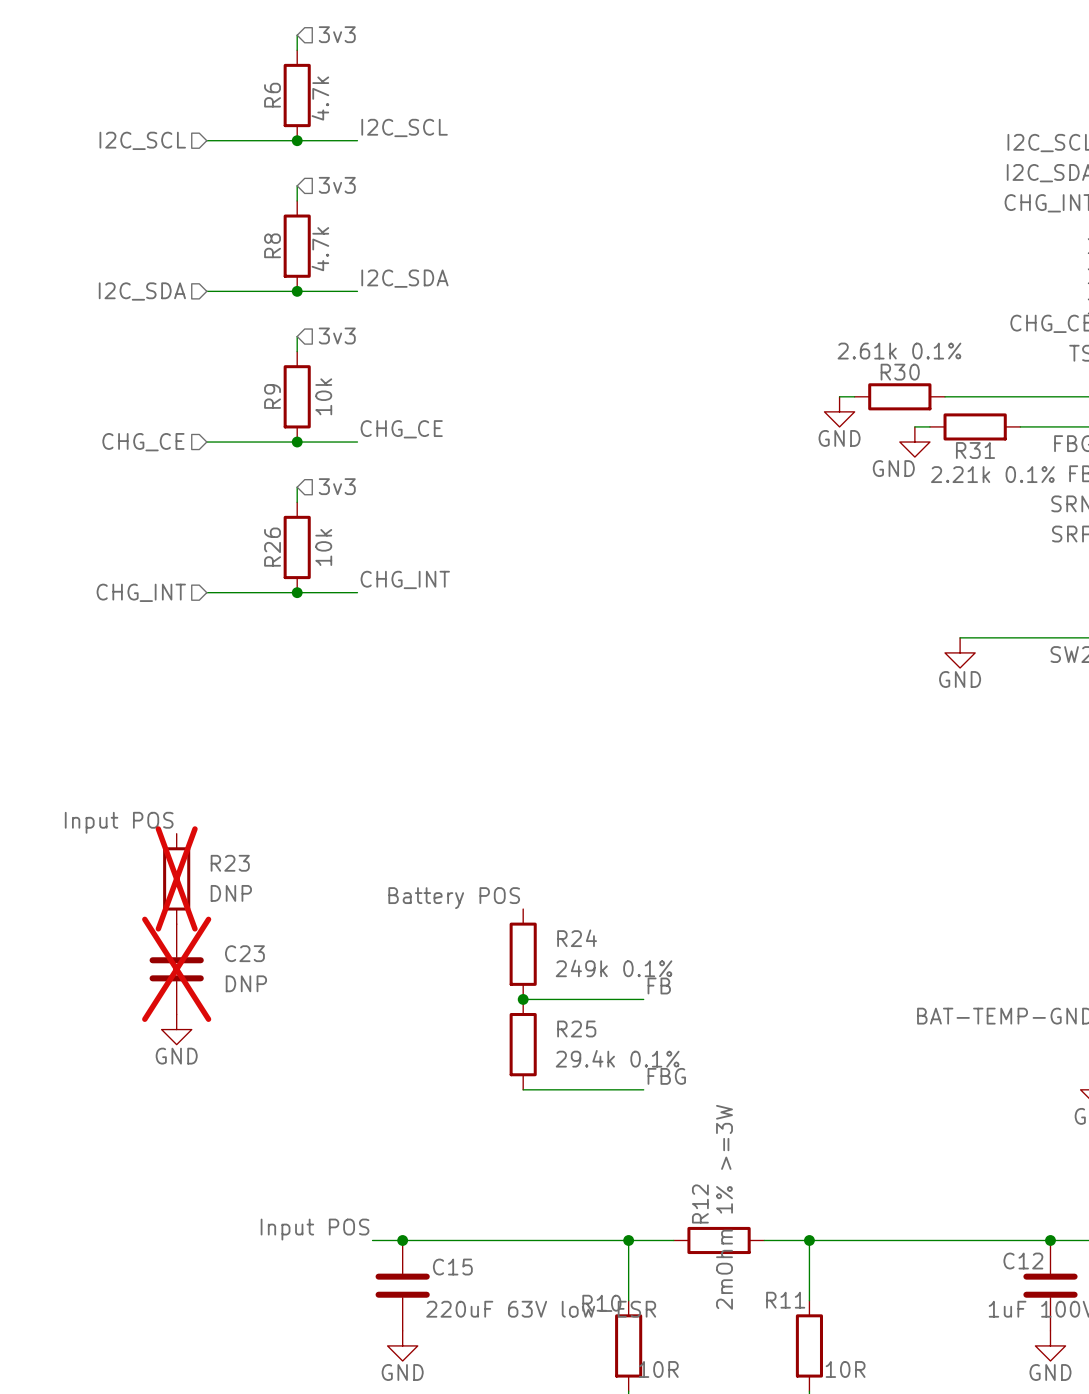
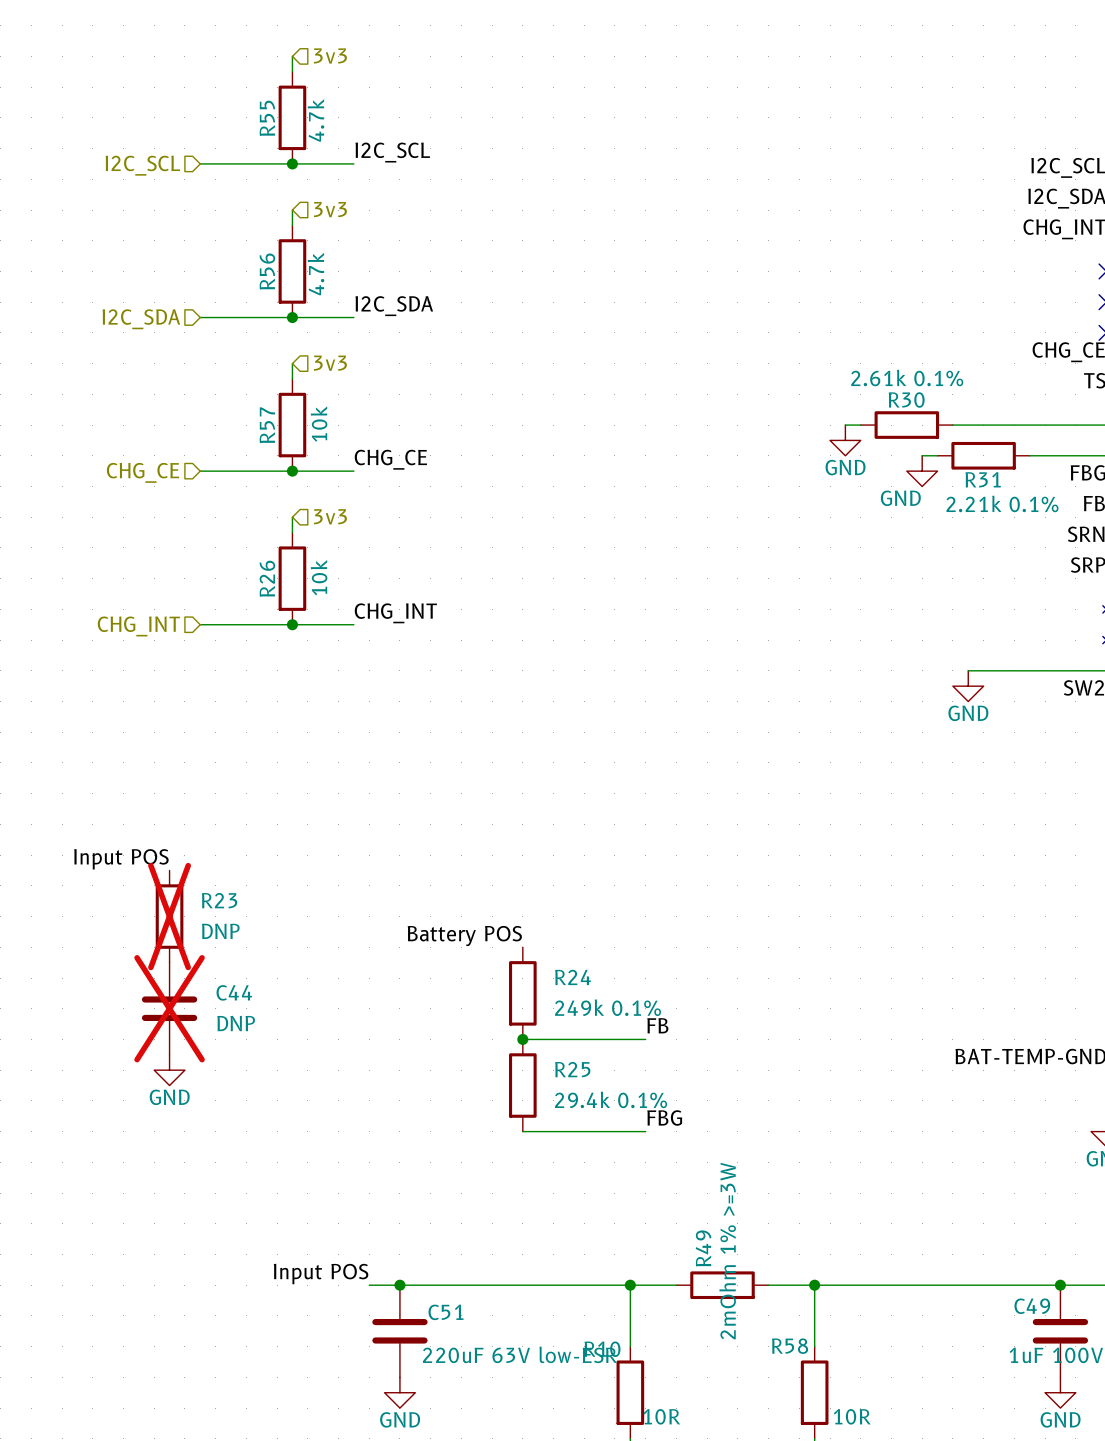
R6 name: R6 (272, 95) -> R55 (267, 118)
R8 name: R8 (272, 245) -> R56 (267, 271)
R9 name: R9 (272, 396) -> R57 (267, 425)
C23 name: C23 (244, 953) -> C44 (234, 992)
R12 name: R12 (700, 1203) -> R49 (703, 1248)
C12 name: C12 (1023, 1261) -> C49 (1032, 1306)
C15 name: C15 (452, 1267) -> C51 (445, 1312)
R11 name: R11 (785, 1300) -> R58 (790, 1346)

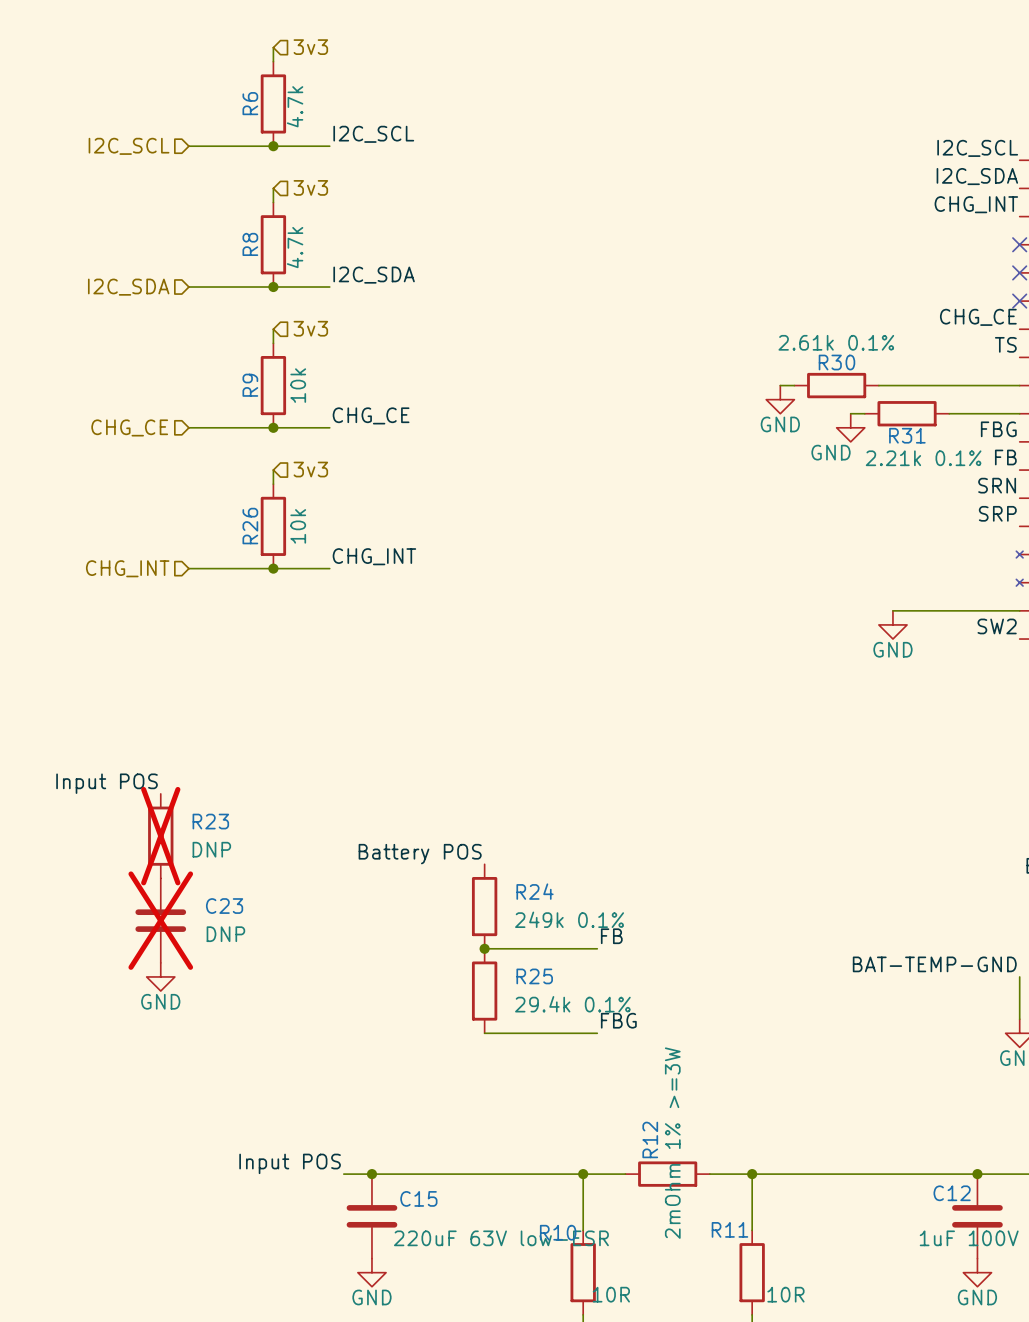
R55 name: R55 (267, 118) -> R6 (250, 103)
R56 name: R56 (267, 271) -> R8 (250, 244)
R57 name: R57 (267, 425) -> R9 (250, 385)
C44 name: C44 (234, 992) -> C23 (224, 906)
R49 name: R49 (703, 1248) -> R12 (650, 1139)
C49 name: C49 (1032, 1306) -> C12 (952, 1193)
C51 name: C51 (445, 1312) -> C15 (418, 1198)
R58 name: R58 (790, 1346) -> R11 (729, 1229)

